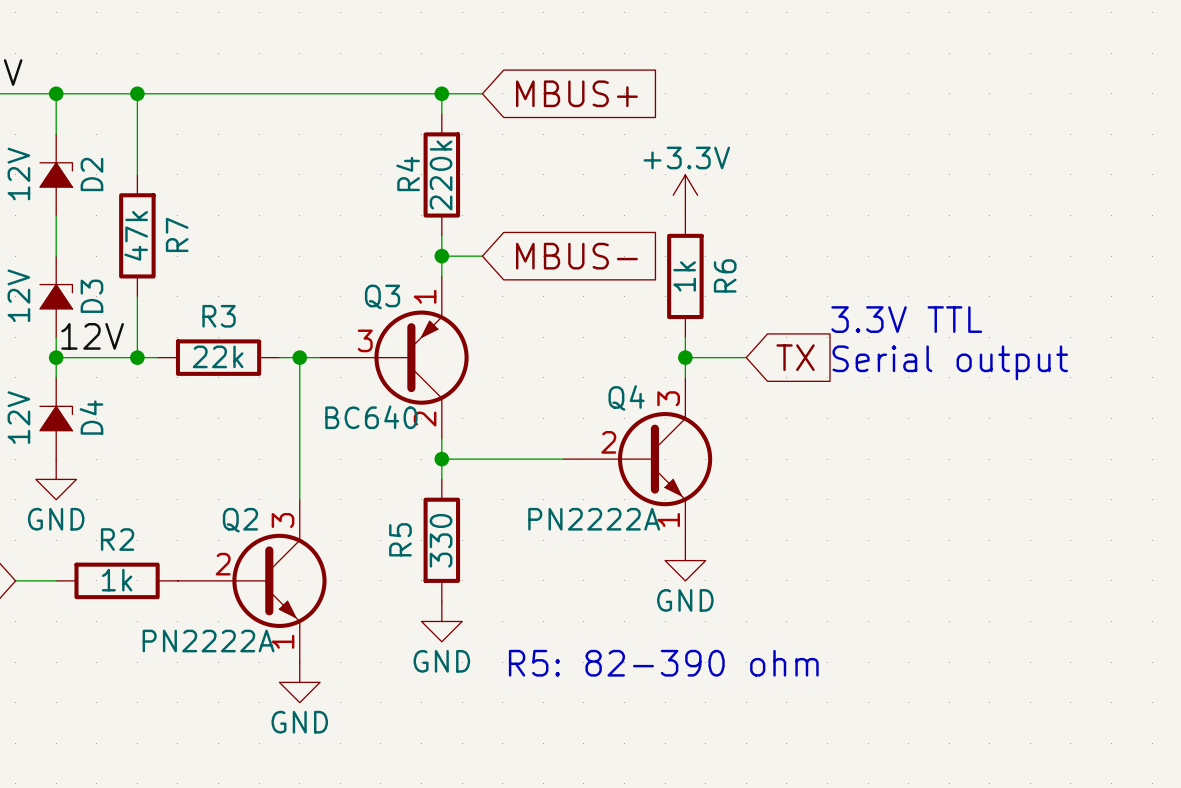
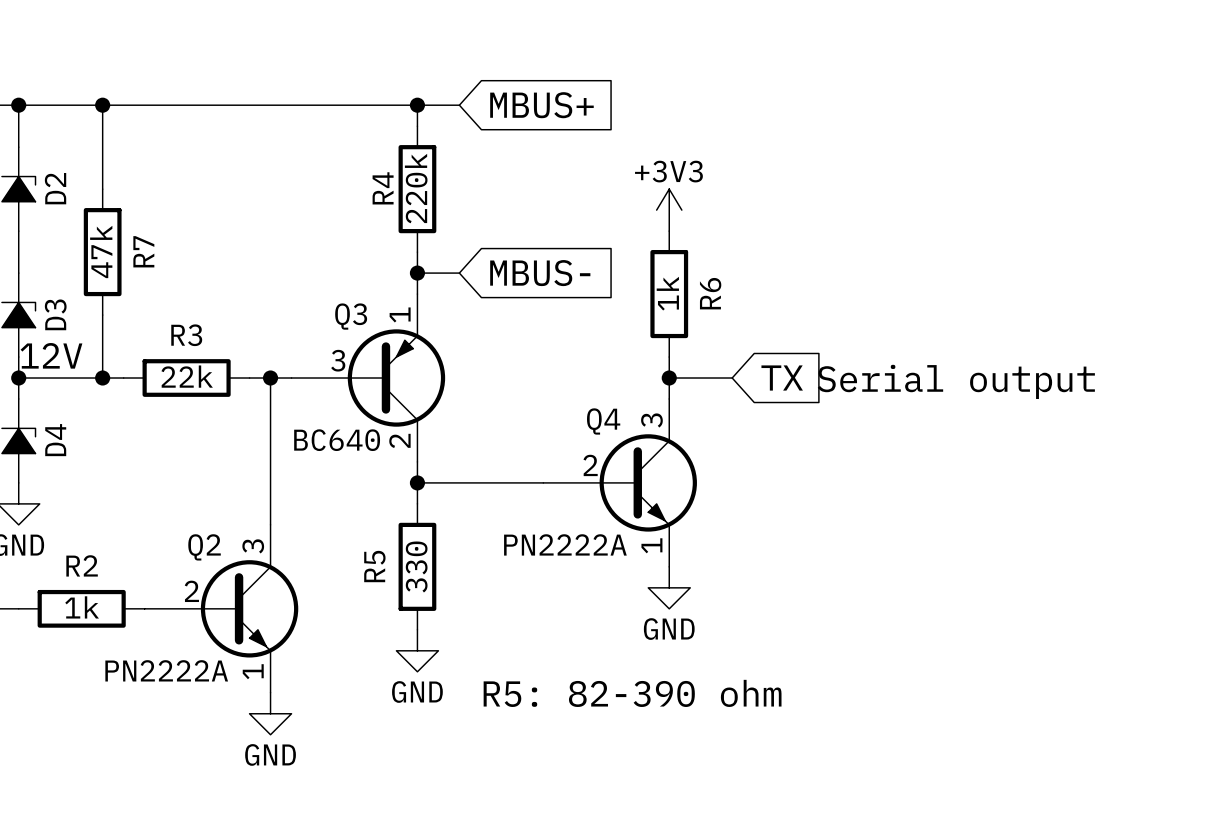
power symbol: +3.3V (685, 195) -> +3V3 (669, 210)
text: 3.3V TTL (906, 319) -> none

